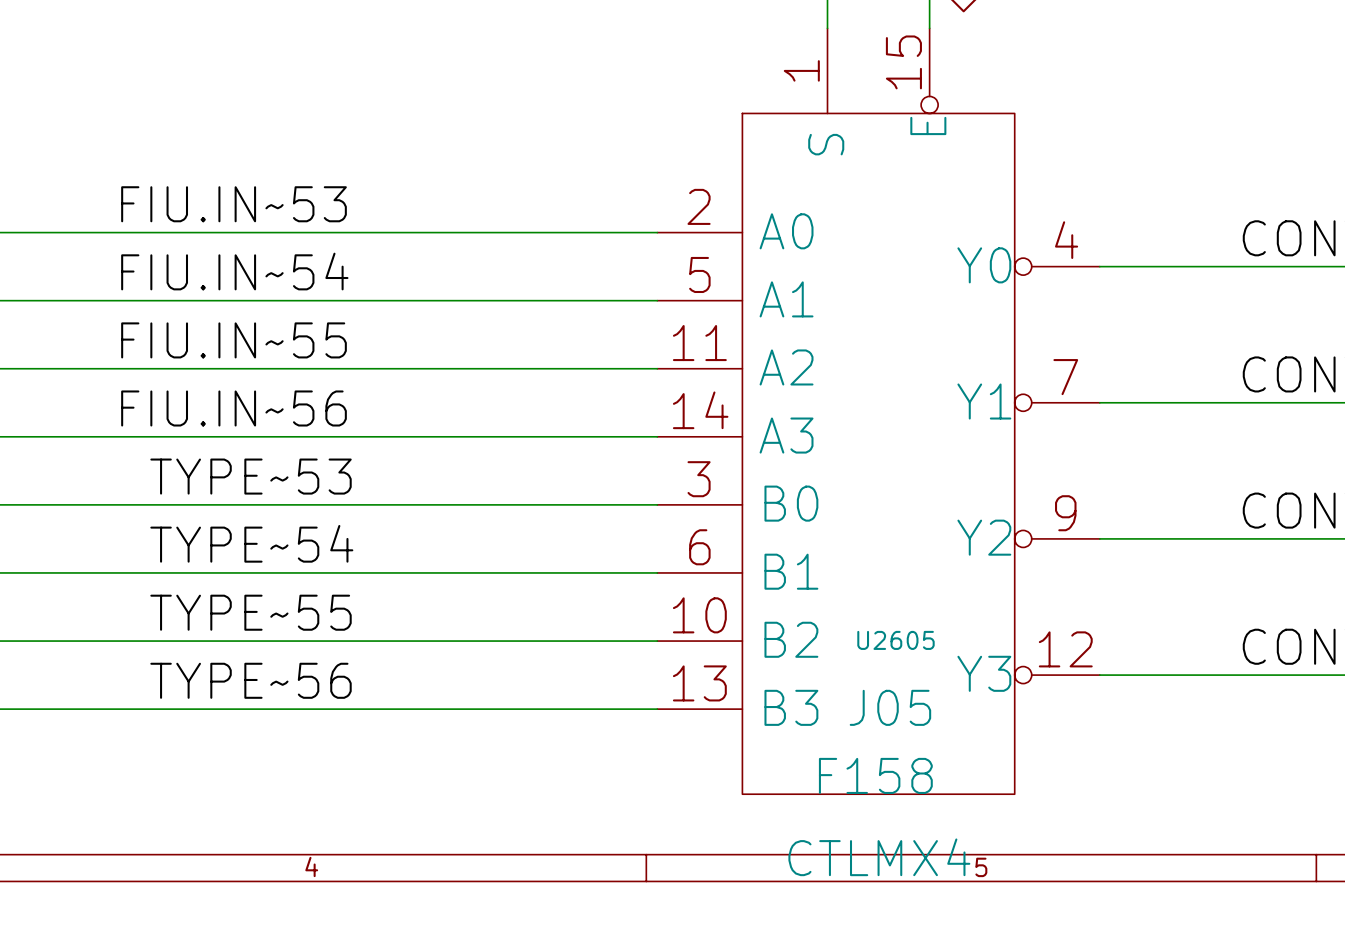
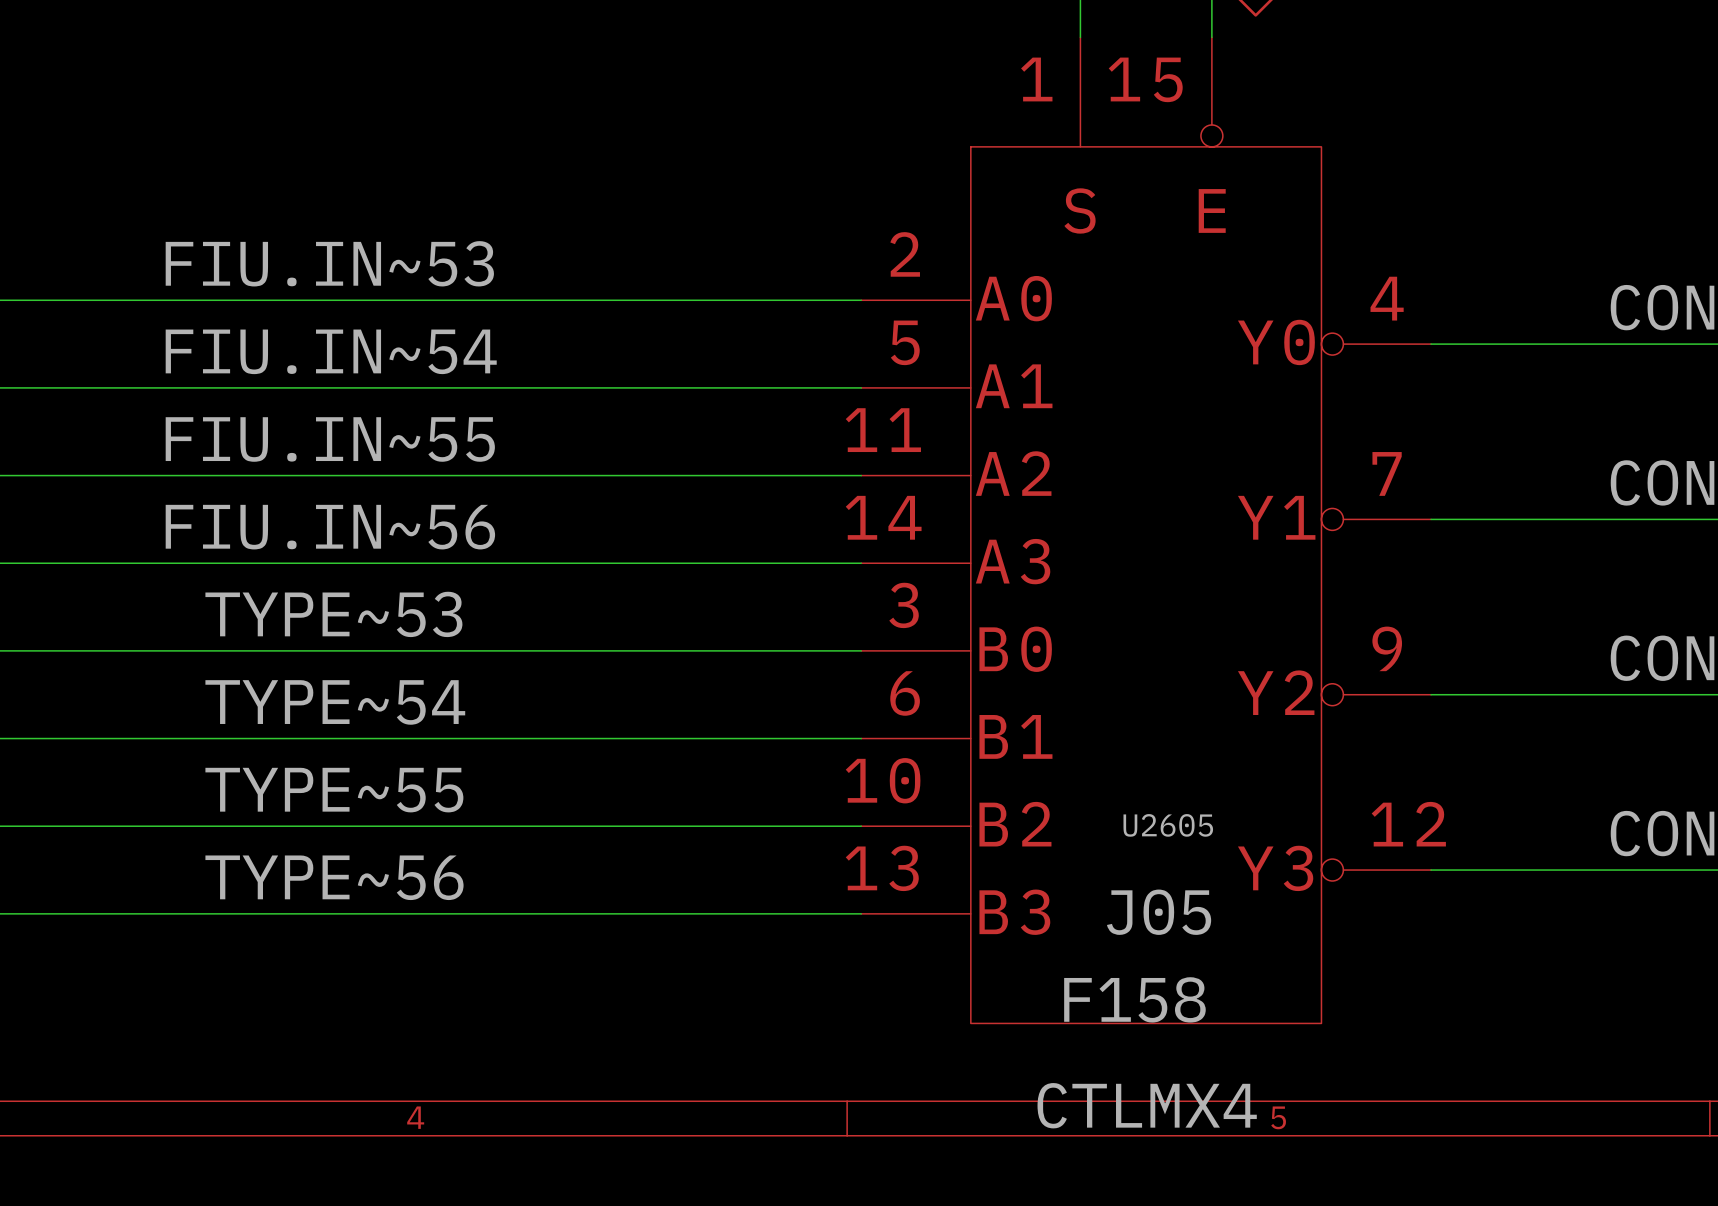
U2605 symbol: [657, 28, 1100, 795] -> [861, 37, 1432, 1024]

